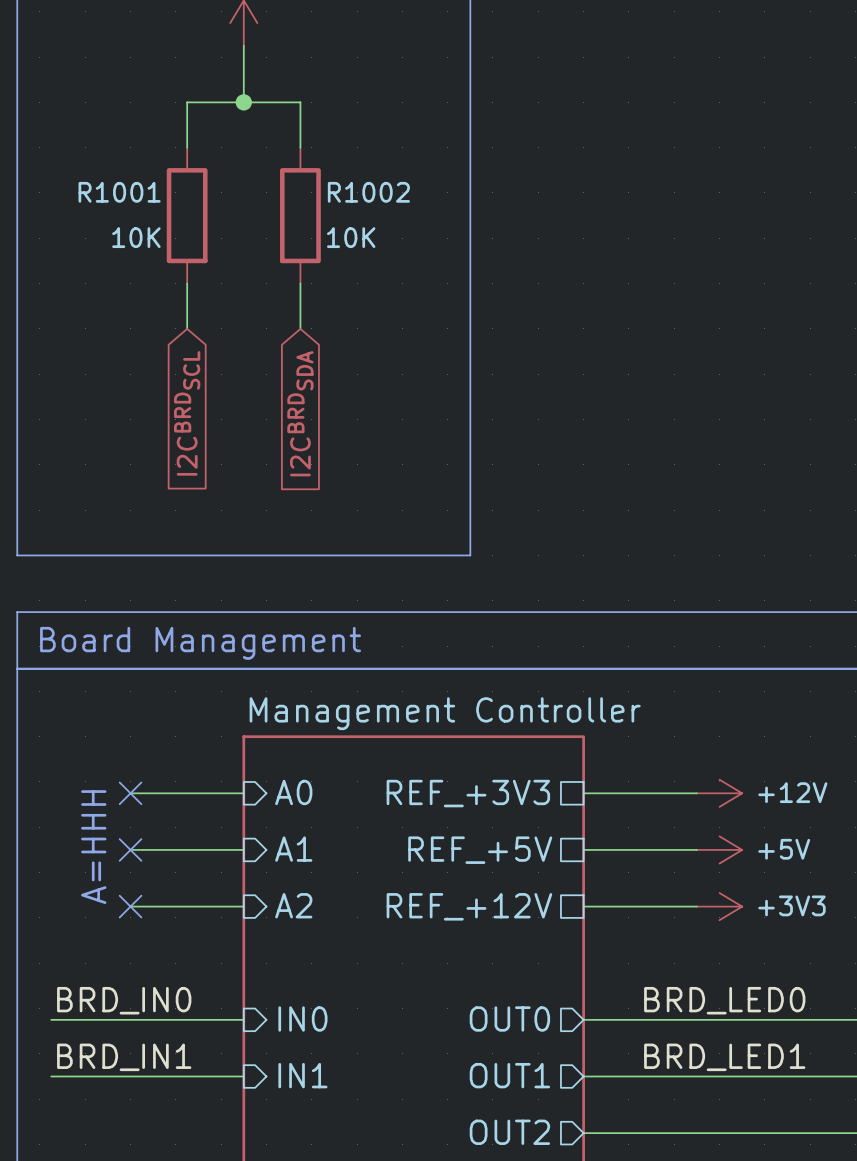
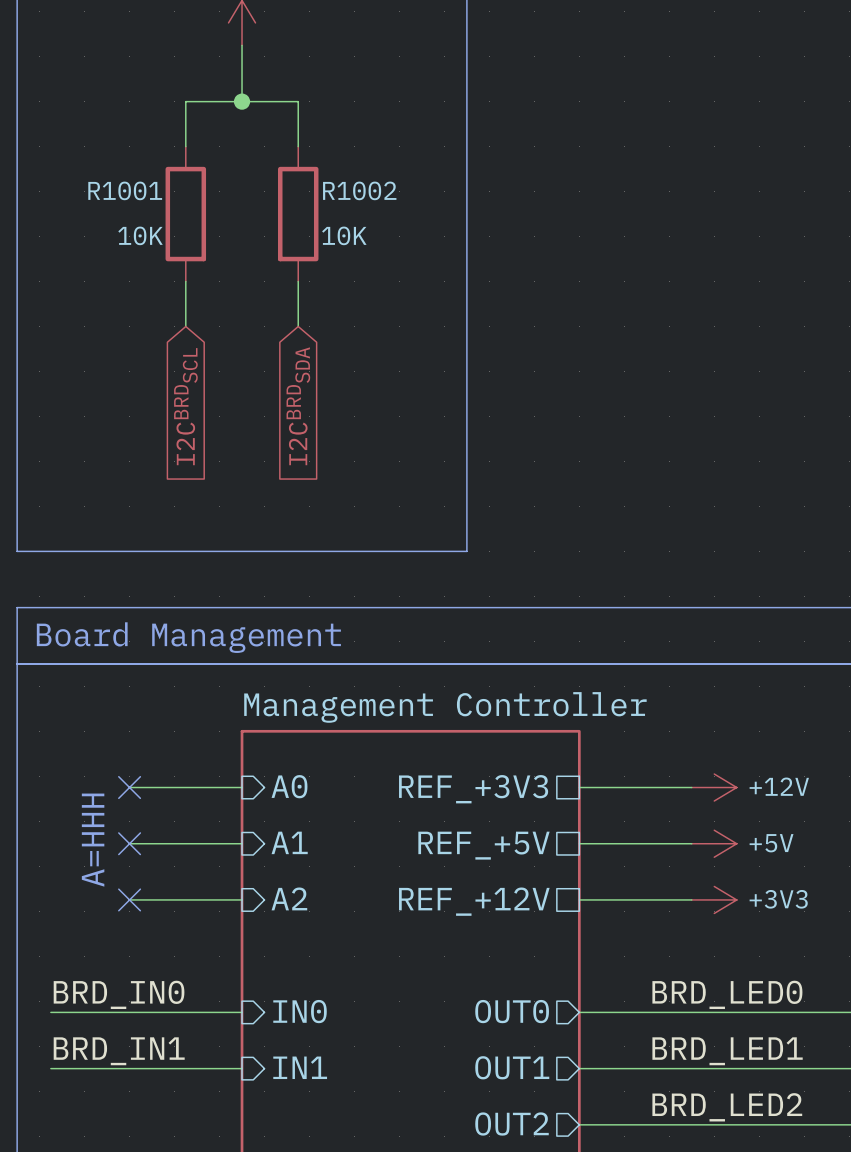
label: none -> BRD_LED2 (727, 1107)

